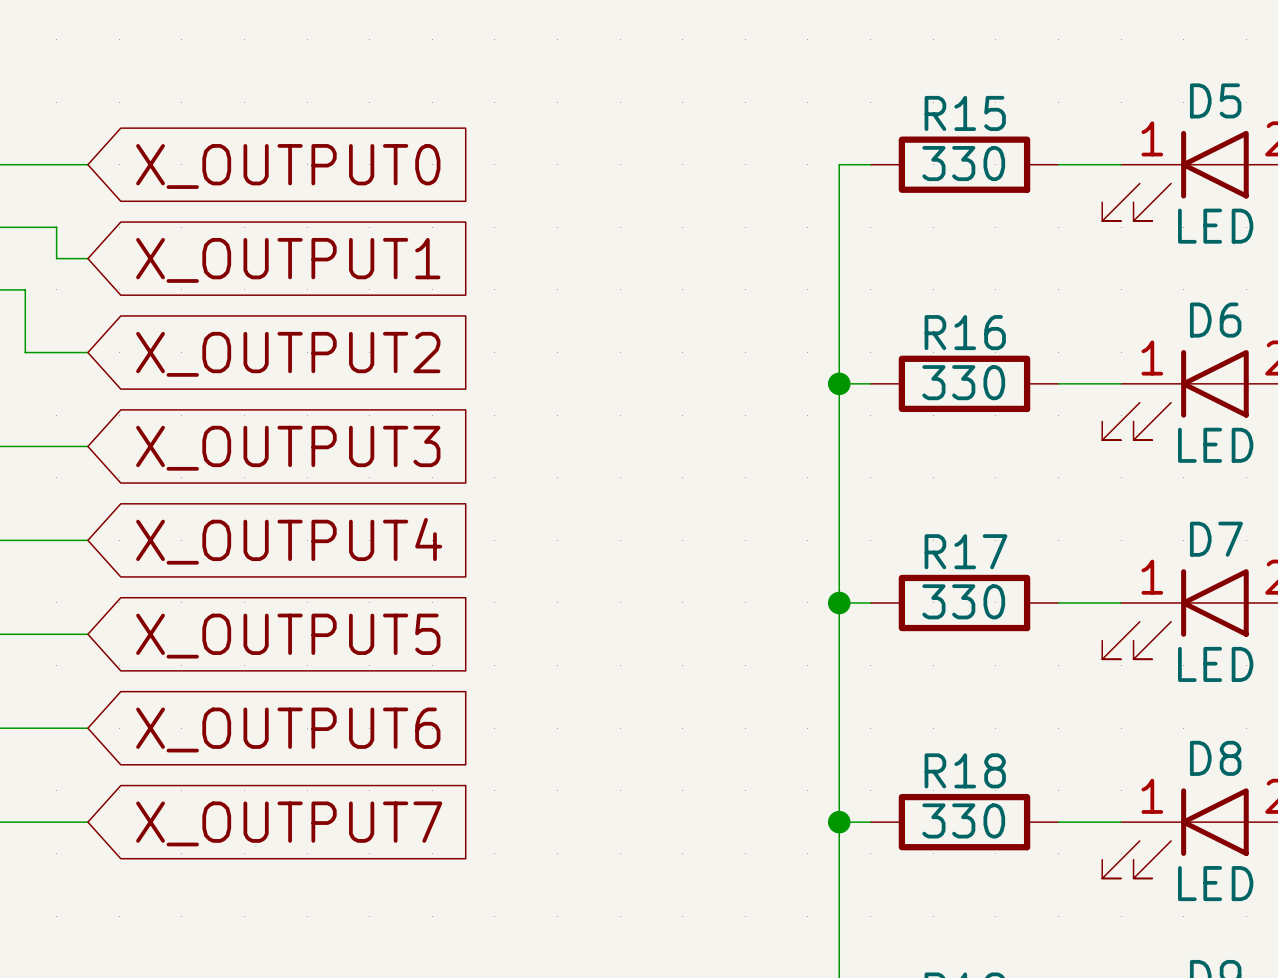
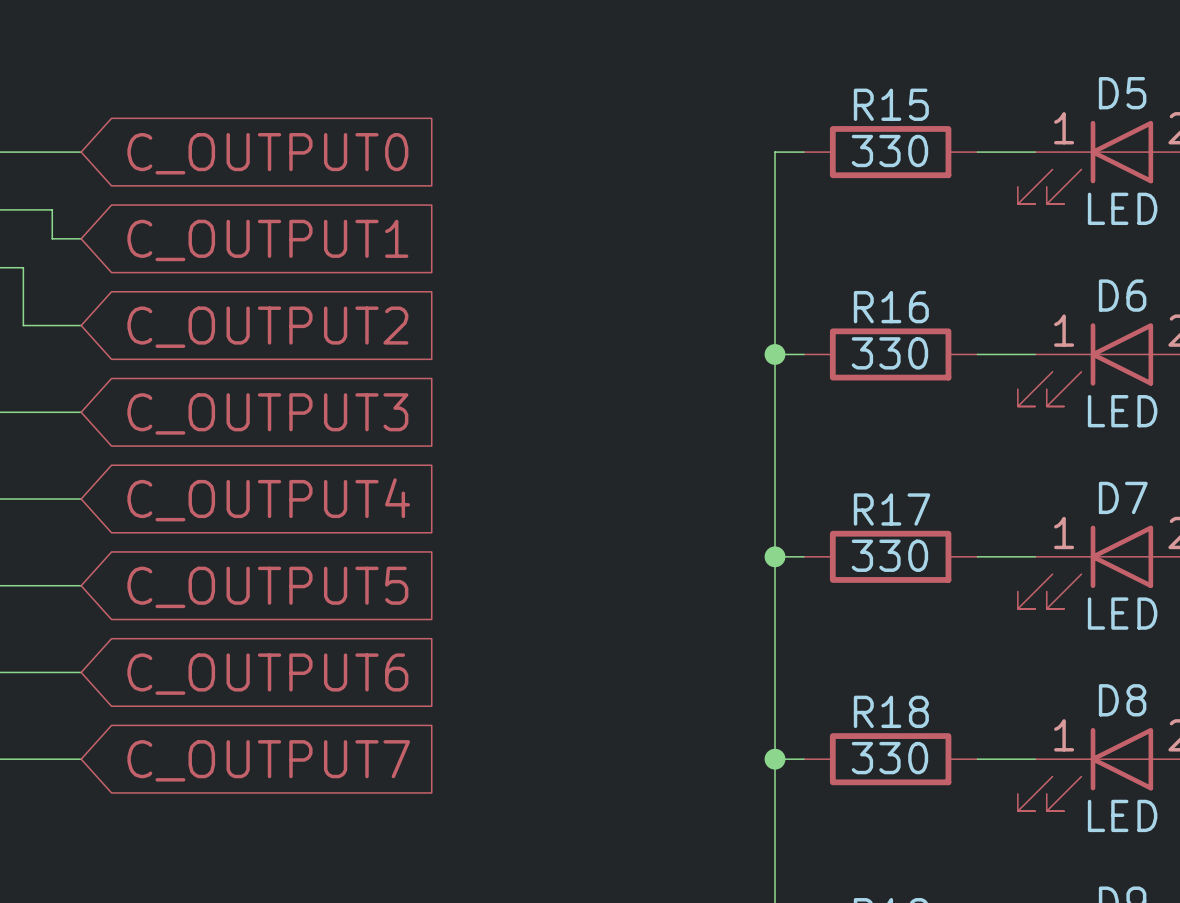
global label: X_OUTPUT0 (288, 166) -> C_OUTPUT0 (267, 153)
global label: X_OUTPUT1 (288, 260) -> C_OUTPUT1 (267, 240)
global label: X_OUTPUT2 (288, 354) -> C_OUTPUT2 (267, 327)
global label: X_OUTPUT3 (288, 448) -> C_OUTPUT3 (267, 413)
global label: X_OUTPUT4 (289, 541) -> C_OUTPUT4 (268, 499)
global label: X_OUTPUT5 (288, 636) -> C_OUTPUT5 (267, 587)
global label: X_OUTPUT6 (288, 730) -> C_OUTPUT6 (267, 674)
global label: X_OUTPUT7 (289, 823) -> C_OUTPUT7 (268, 760)

